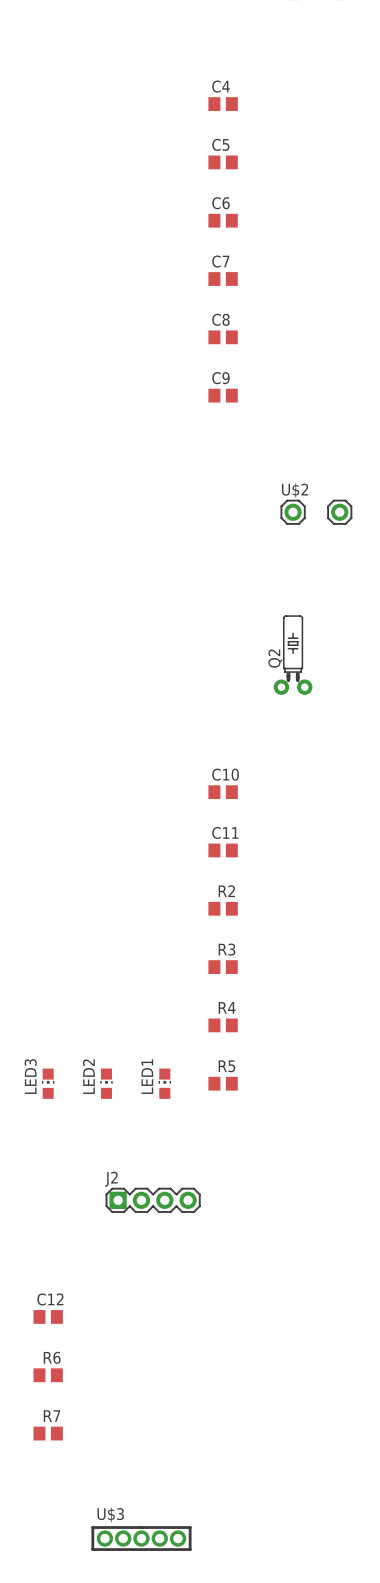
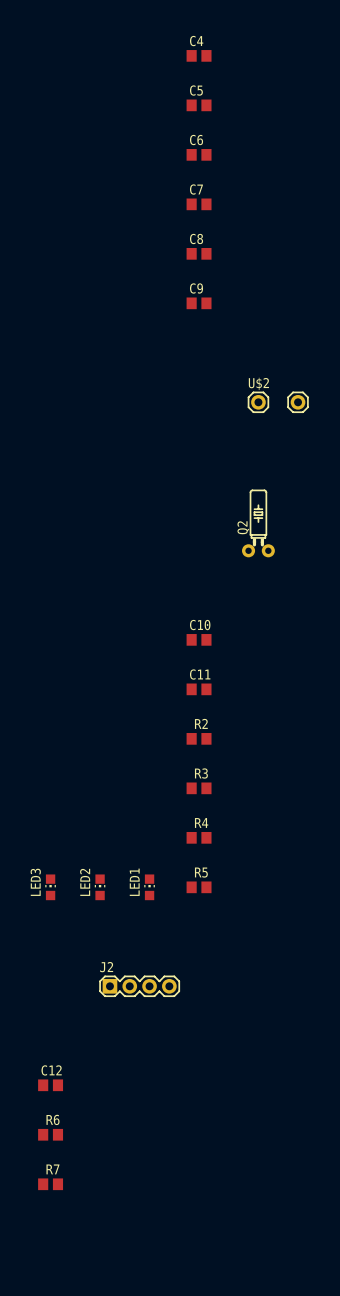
U$3: (141, 1538) -> none

